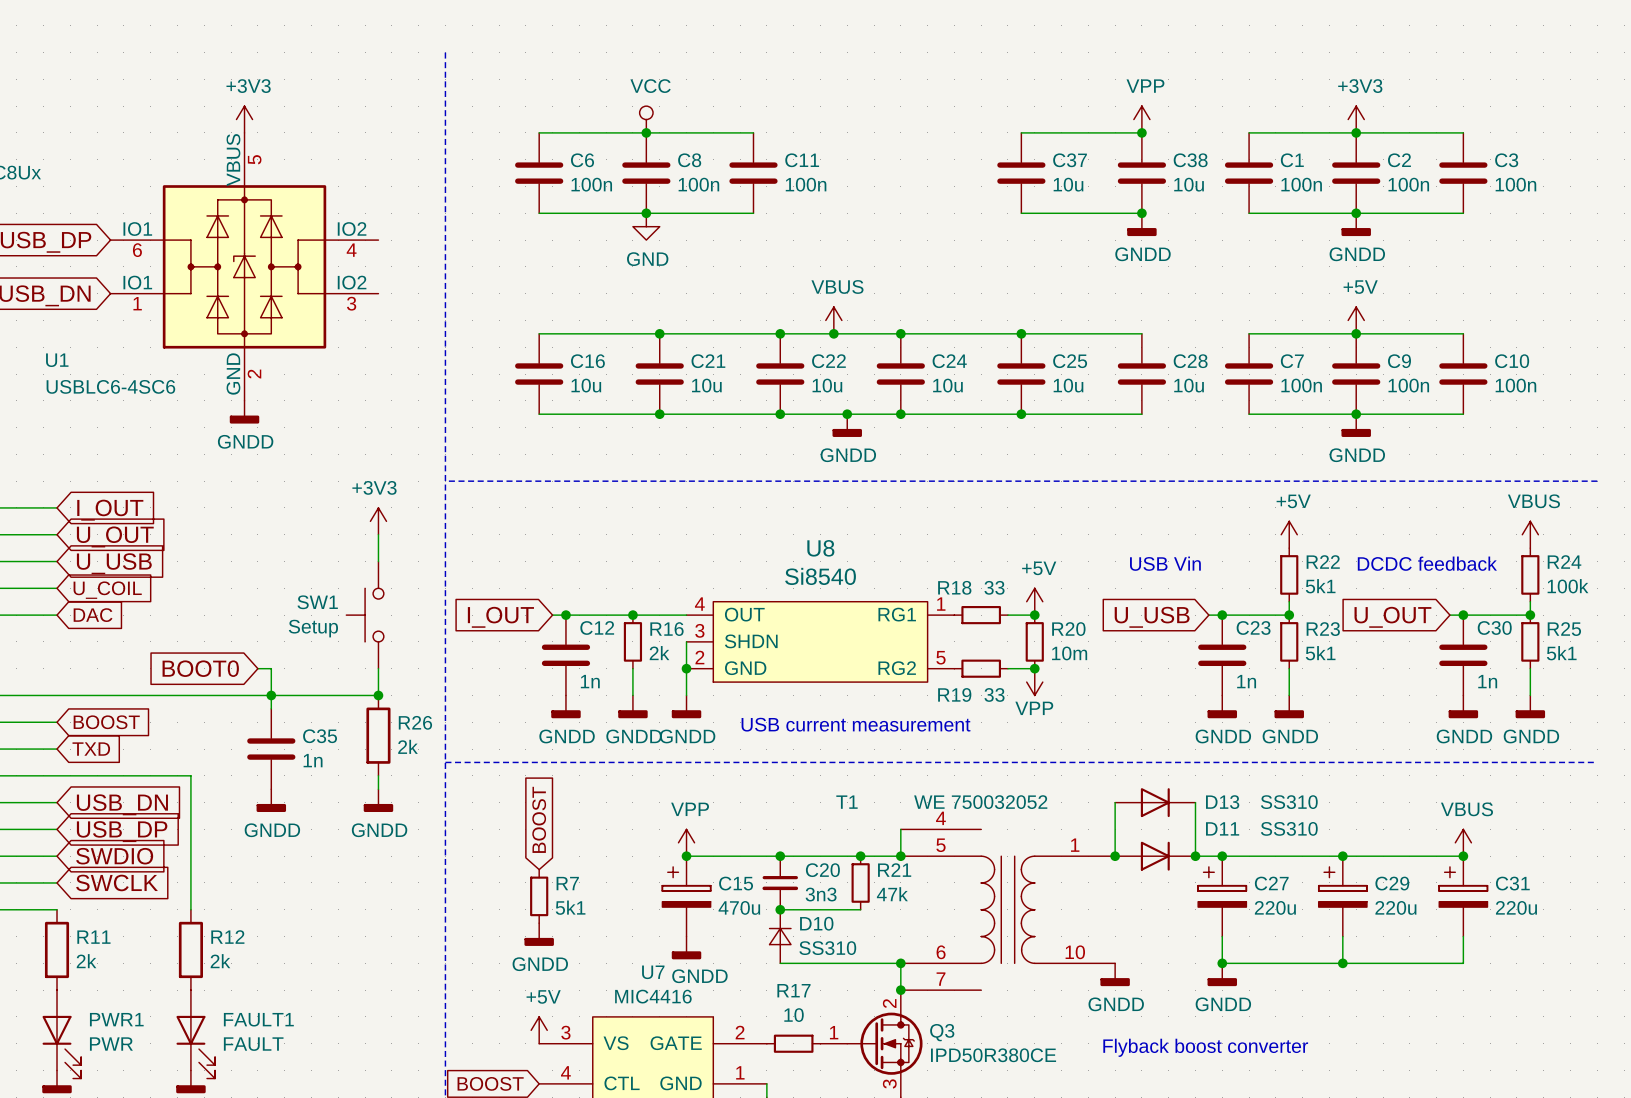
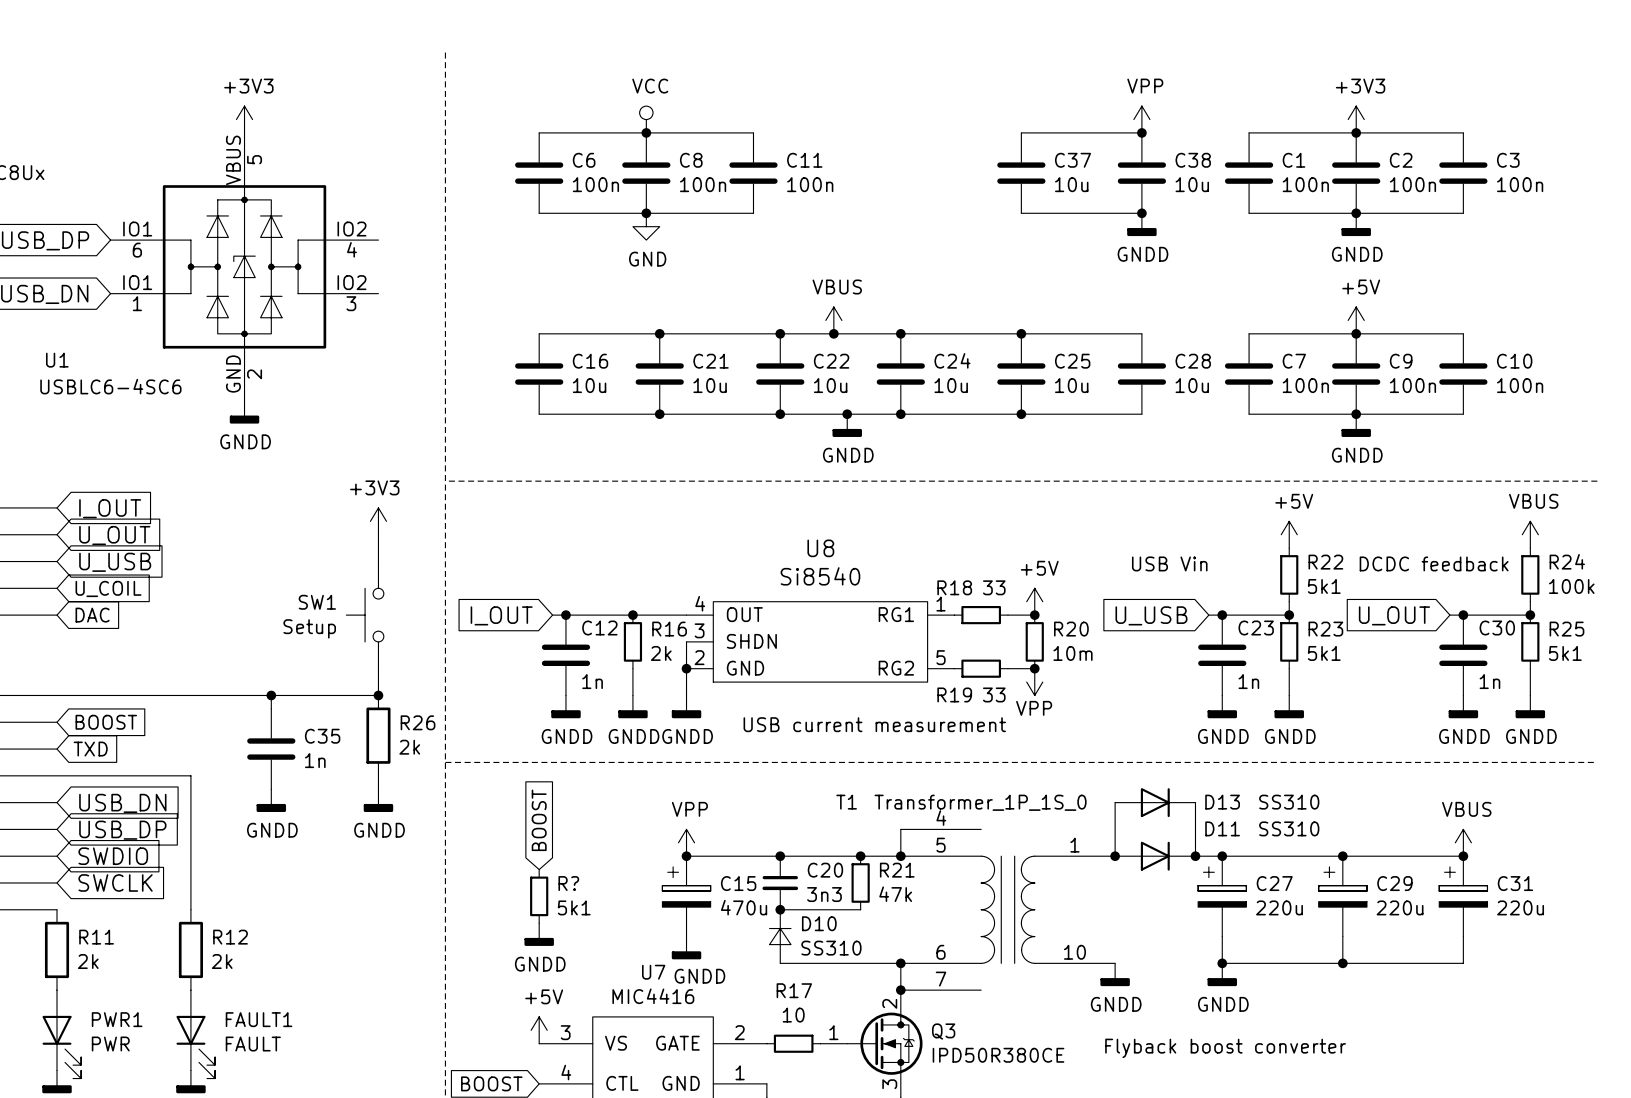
global label: BOOT0 (200, 668) -> none
wire: (257, 668) (271, 668) (271, 695) -> none
T1 value: WE 750032052 (980, 802) -> Transformer_1P_1S_0 (980, 802)
R7 name: R7 (567, 883) -> R? (568, 883)

